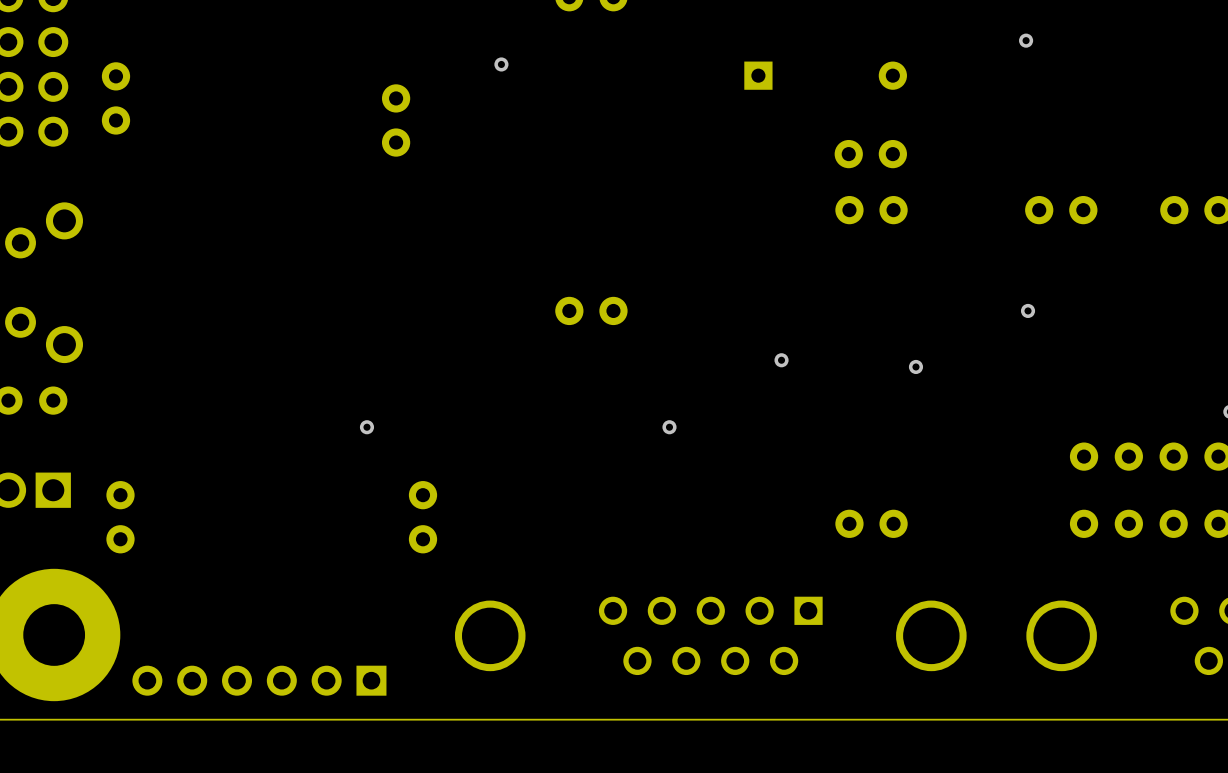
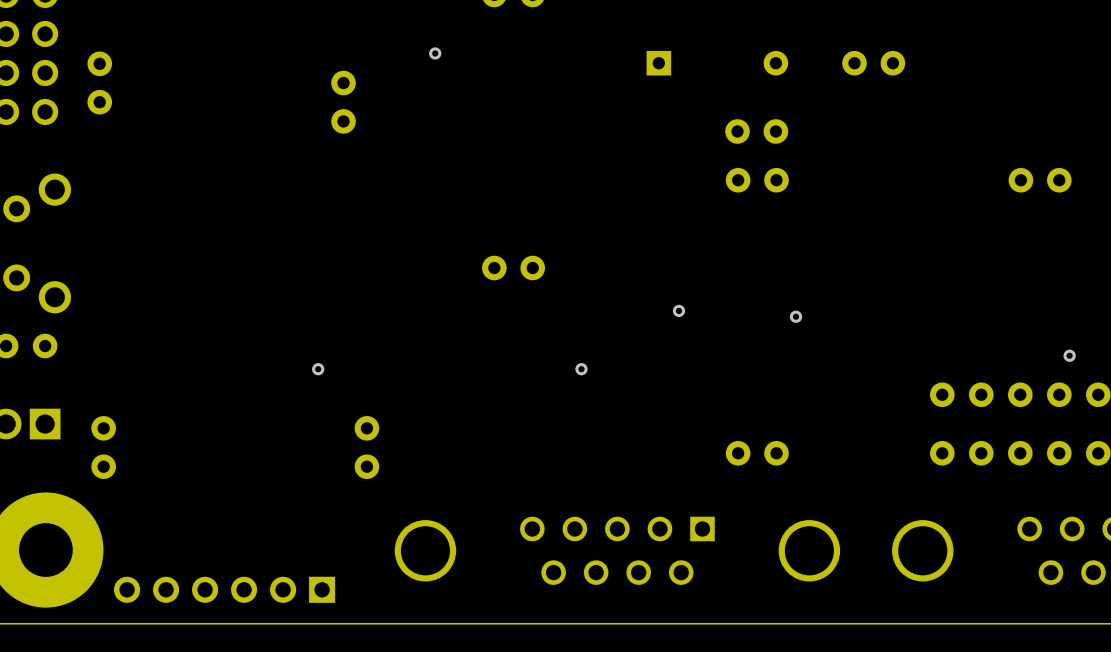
via: (1026, 40) -> none
part position: (1061, 210) -> (873, 63)
via: (1028, 310) -> none

